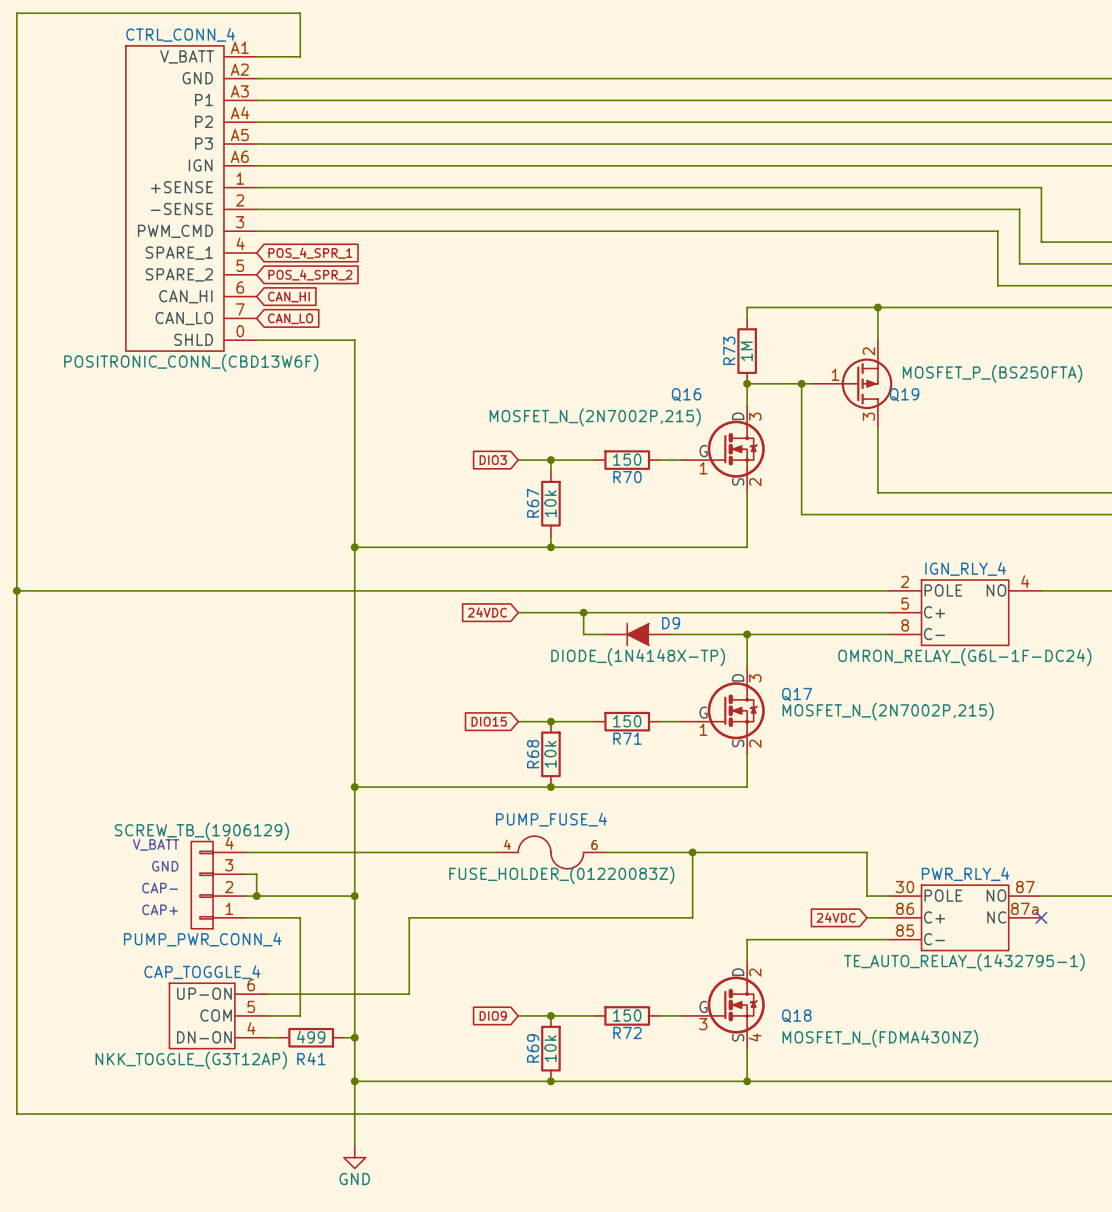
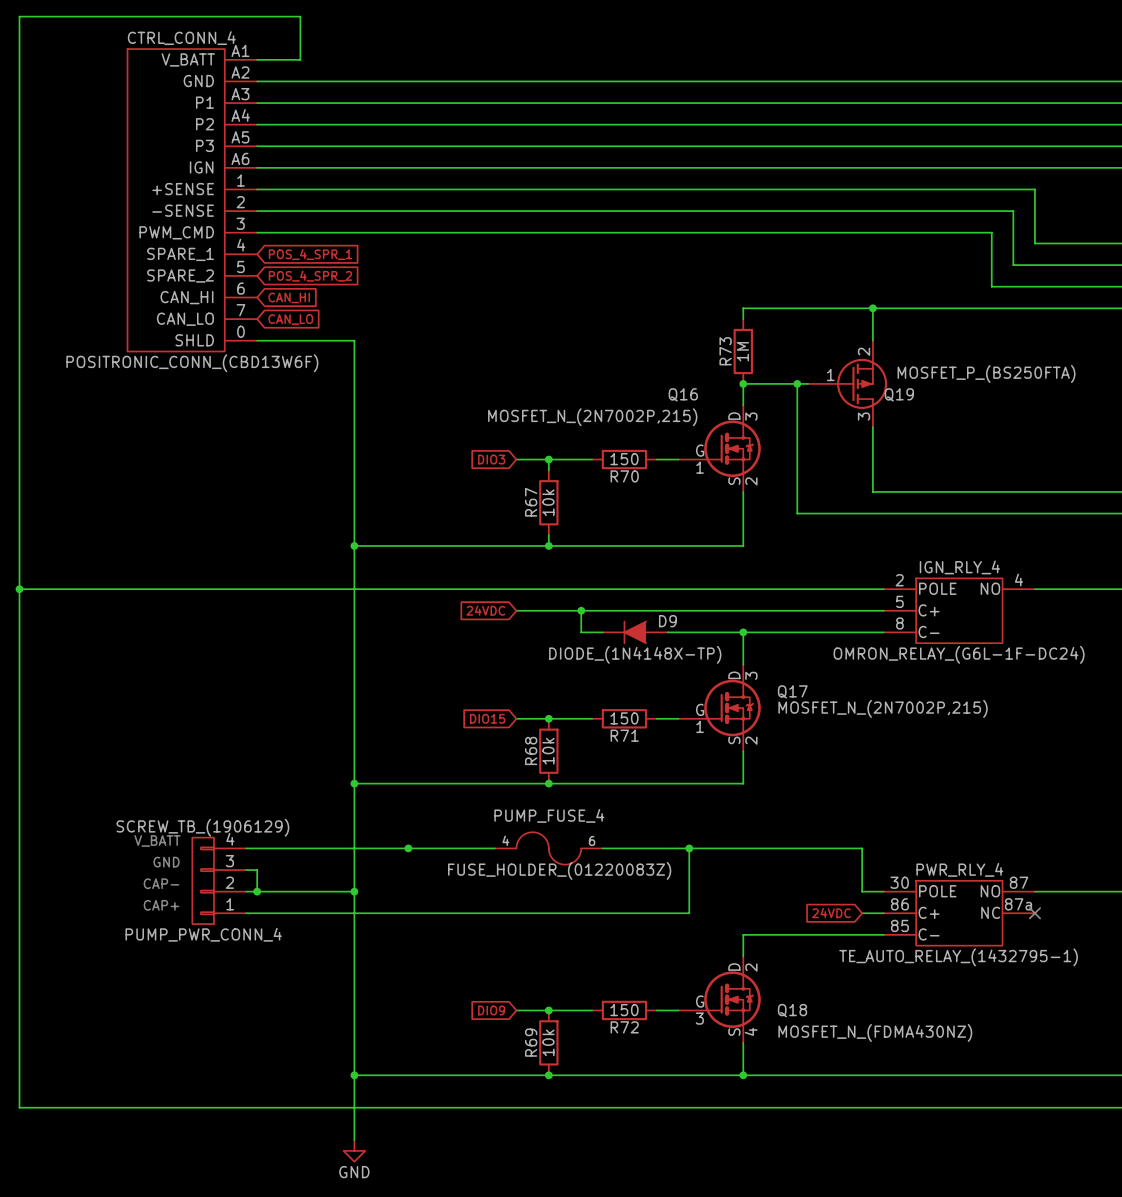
junction: none -> (408, 848)
wire: (300, 917) (300, 1015) (267, 1015) -> none
wire: (409, 917) (409, 994) (267, 994) -> (408, 913) (300, 913)
CAP_TOGGLE_4: NKK_TOGGLE_(G3T12AP) (218, 1015) -> none
wire: (267, 1037) (278, 1037) -> none
R41: 499 (311, 1037) -> none
wire: (343, 1037) (354, 1037) -> none
junction: (354, 1037) -> none

